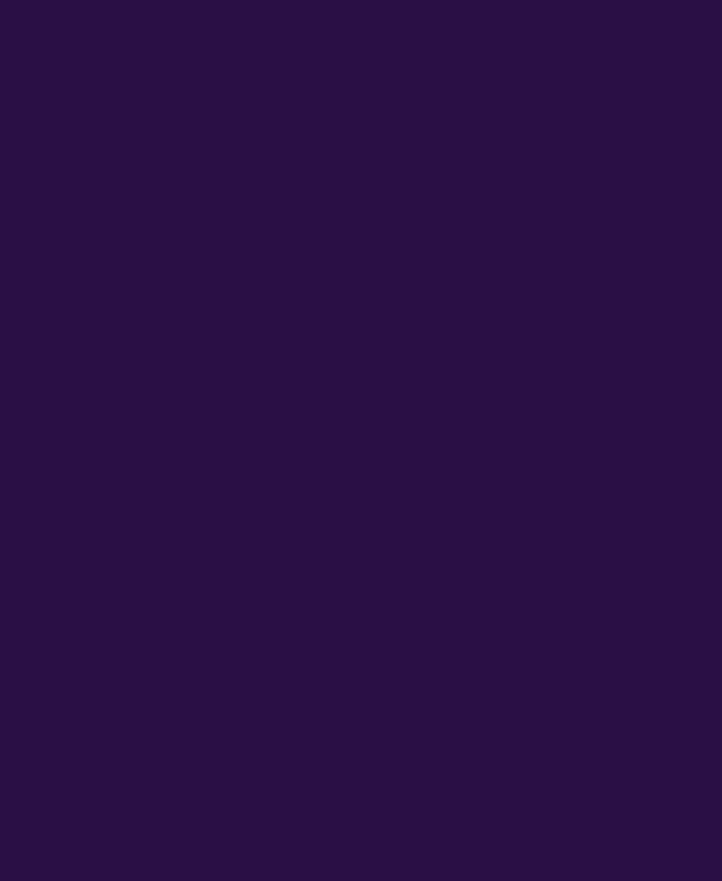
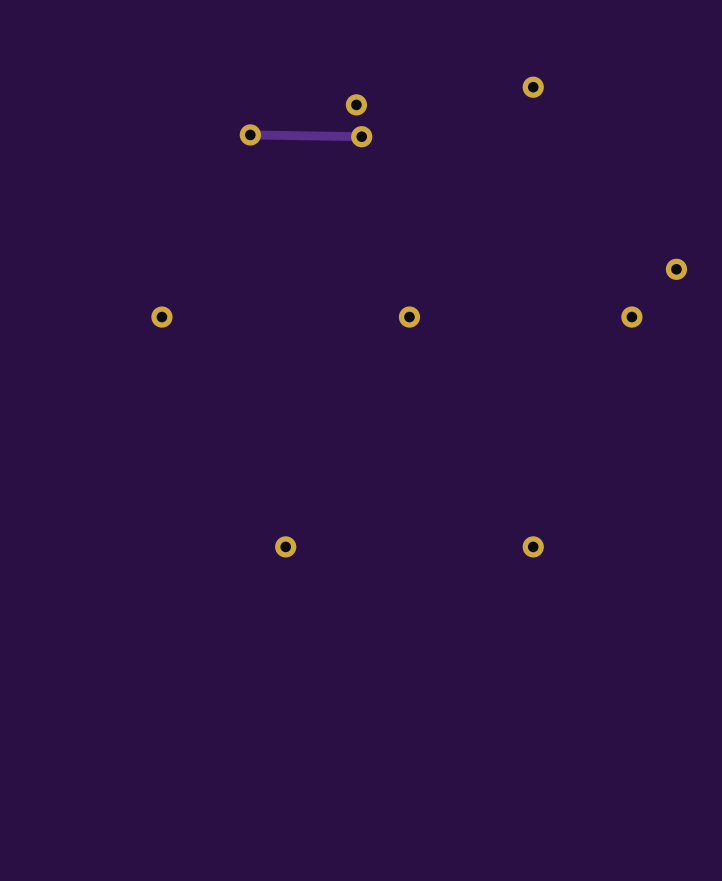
via: none -> (533, 87)
via: none -> (356, 104)
track: none -> (250, 134) (361, 136)
via: none -> (250, 134)
via: none -> (361, 136)
via: none -> (676, 269)
via: none -> (161, 317)
via: none -> (409, 317)
via: none -> (631, 317)
via: none -> (285, 546)
via: none -> (533, 546)

